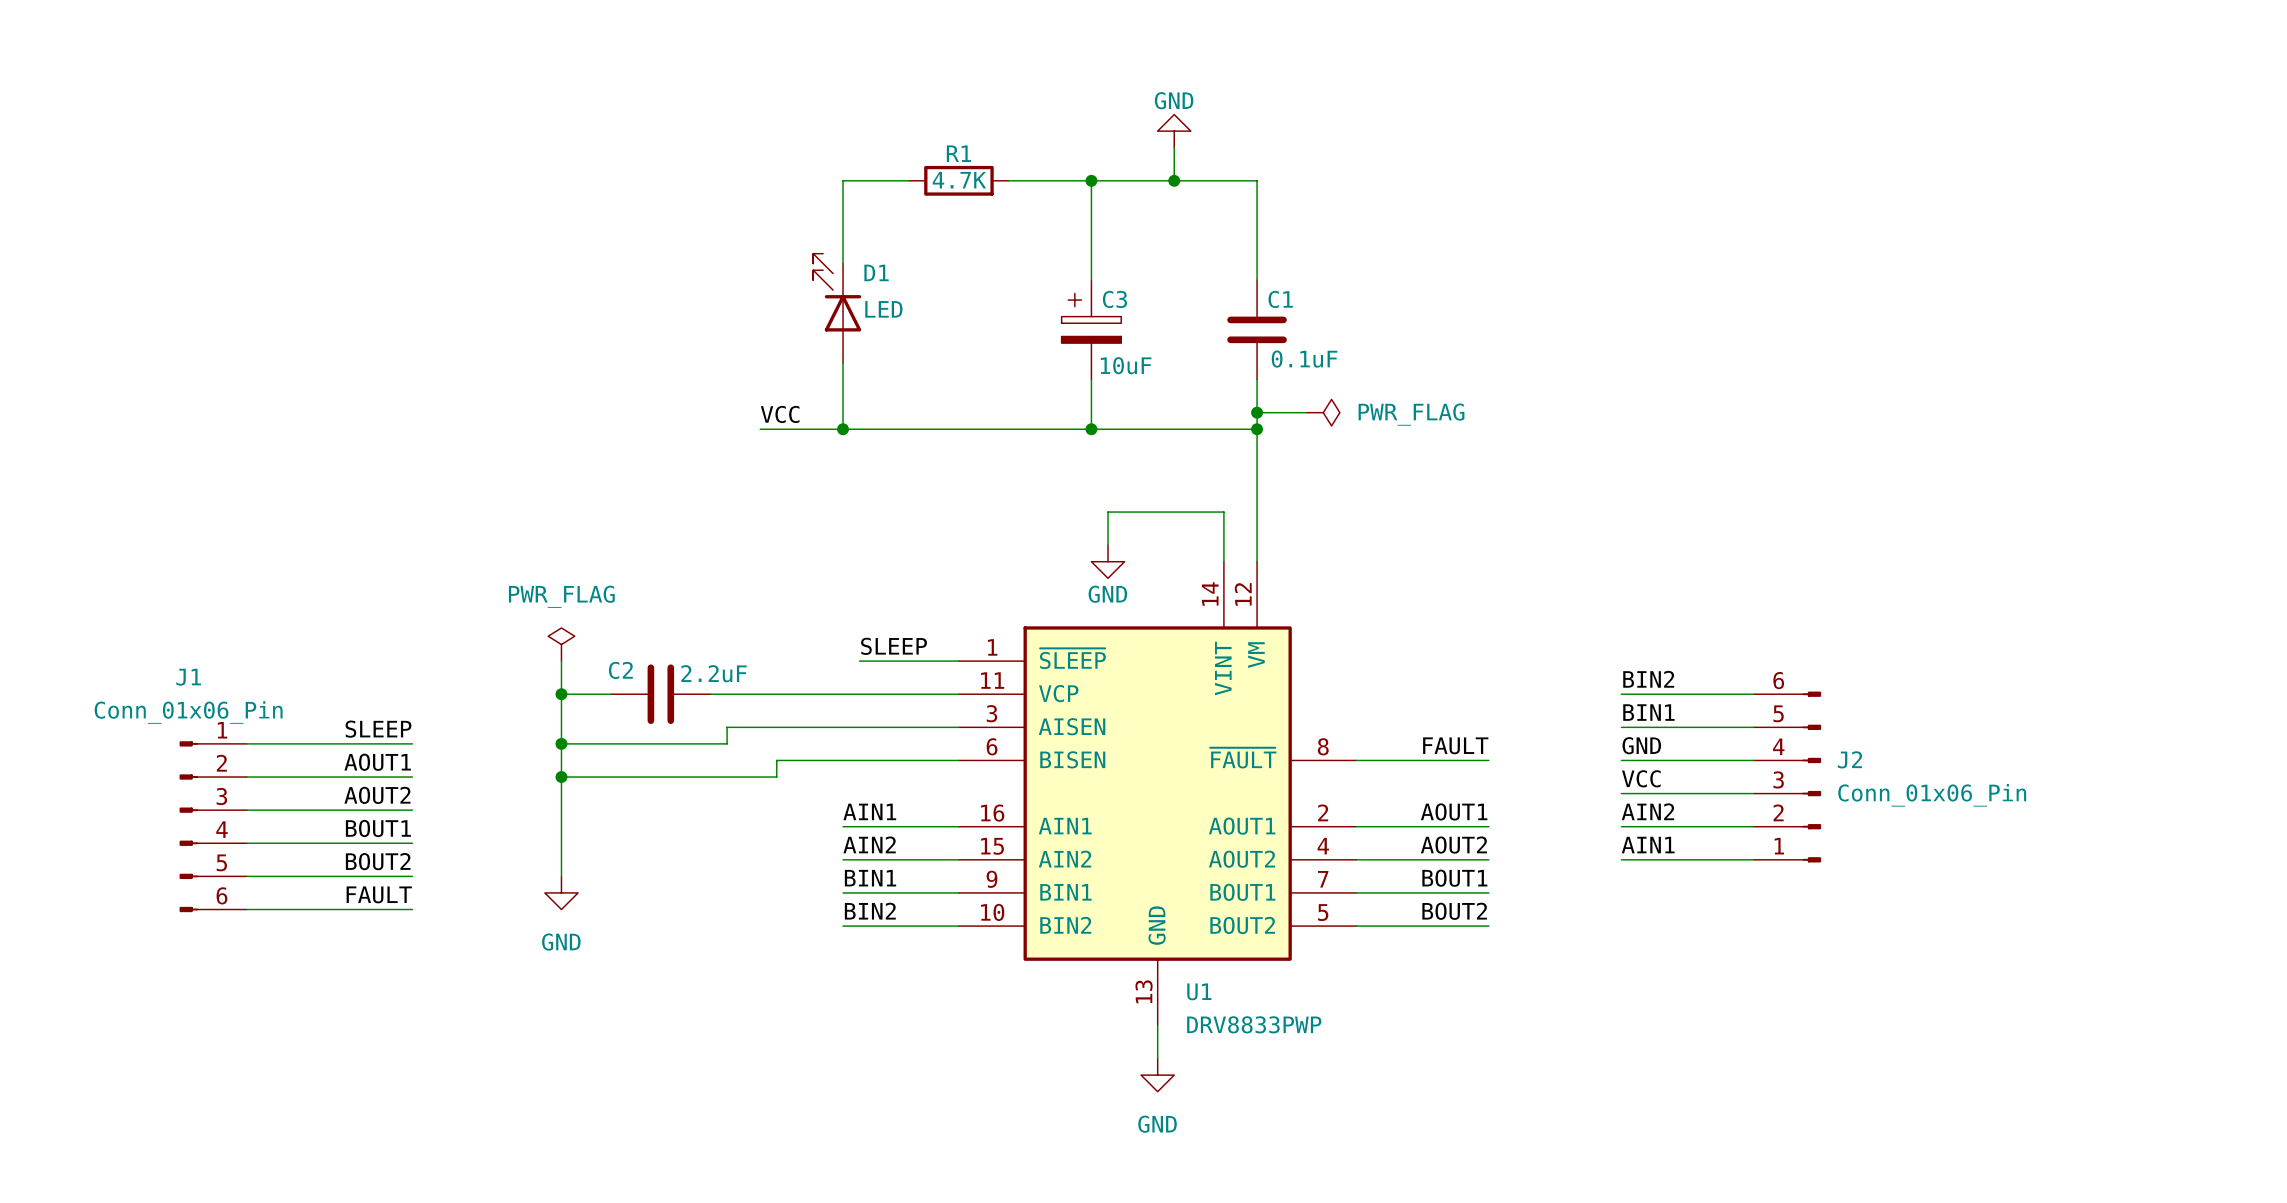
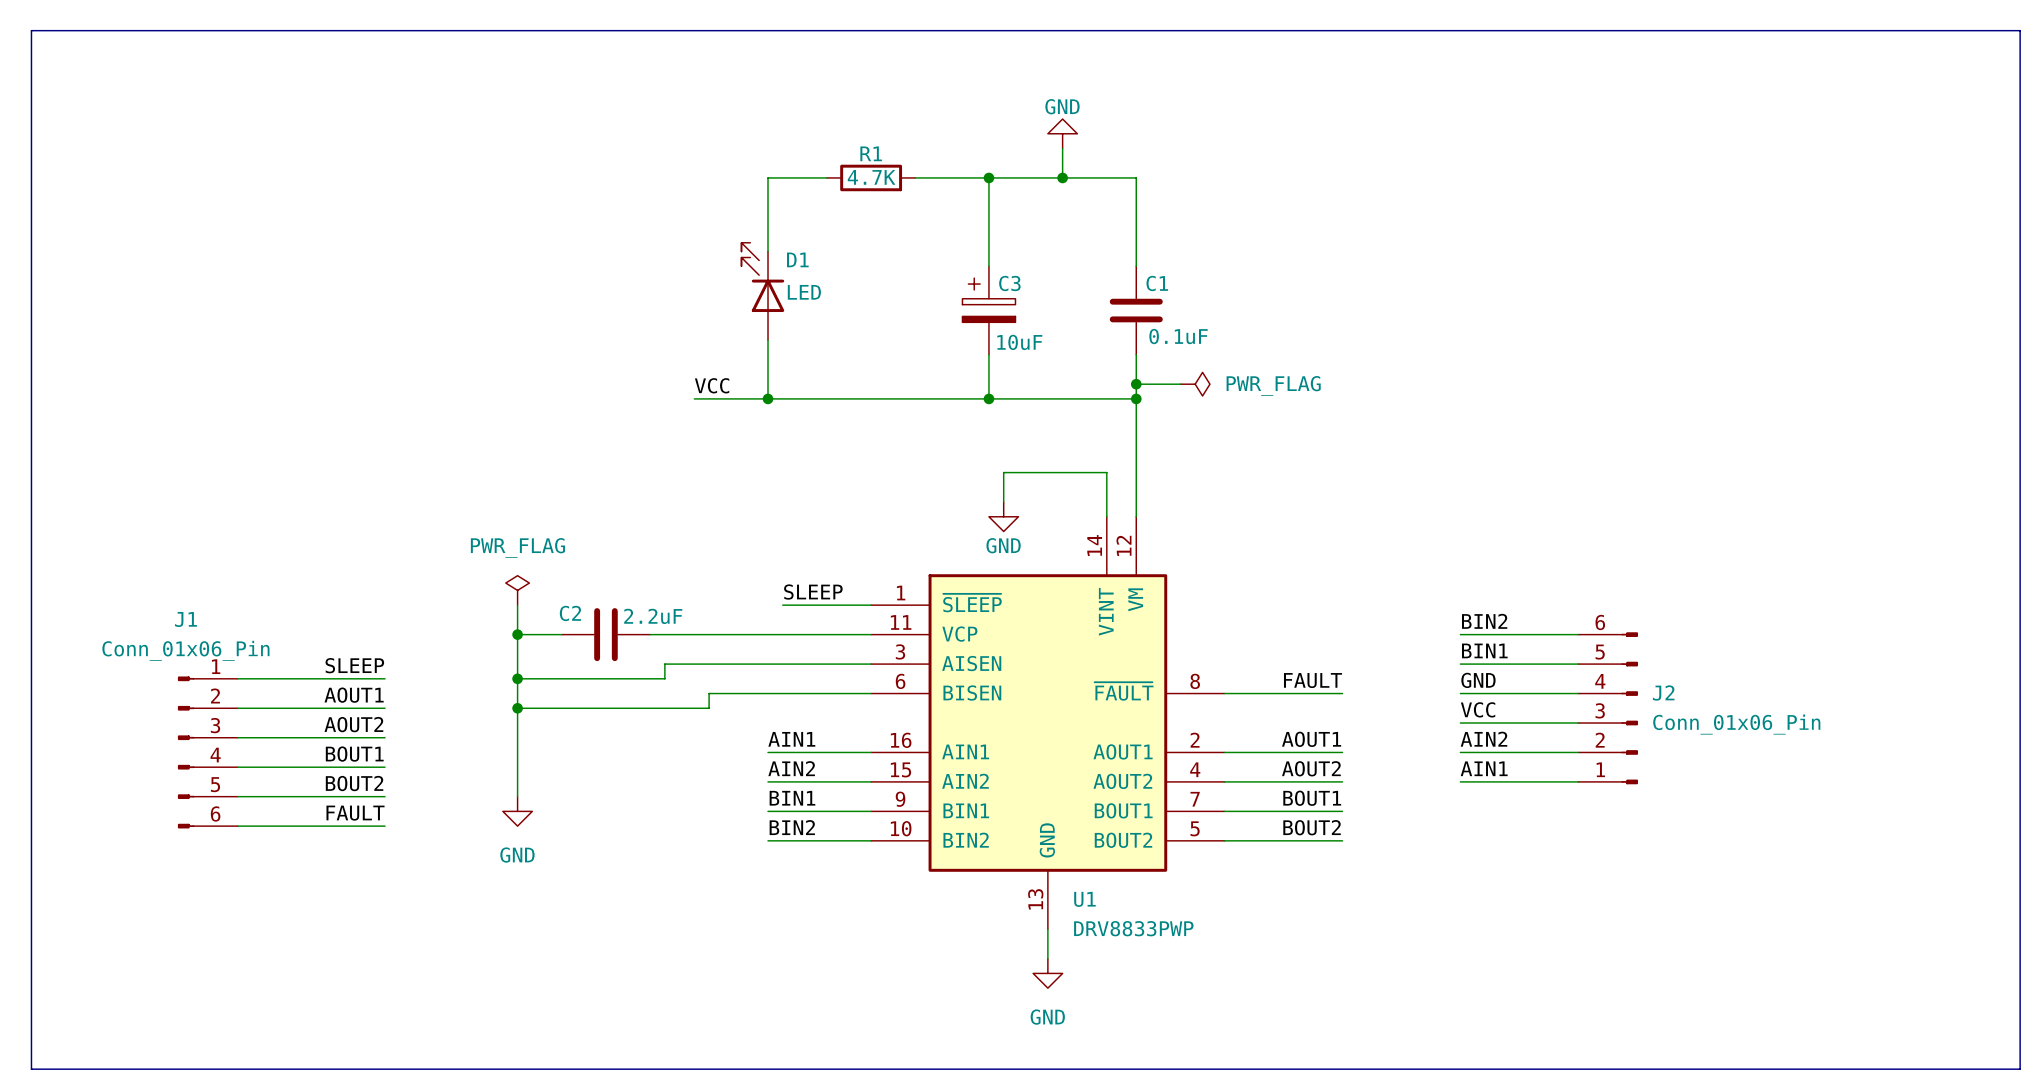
line: none -> (31, 30) (2020, 30) (2020, 1069) (31, 1069) (31, 30)

